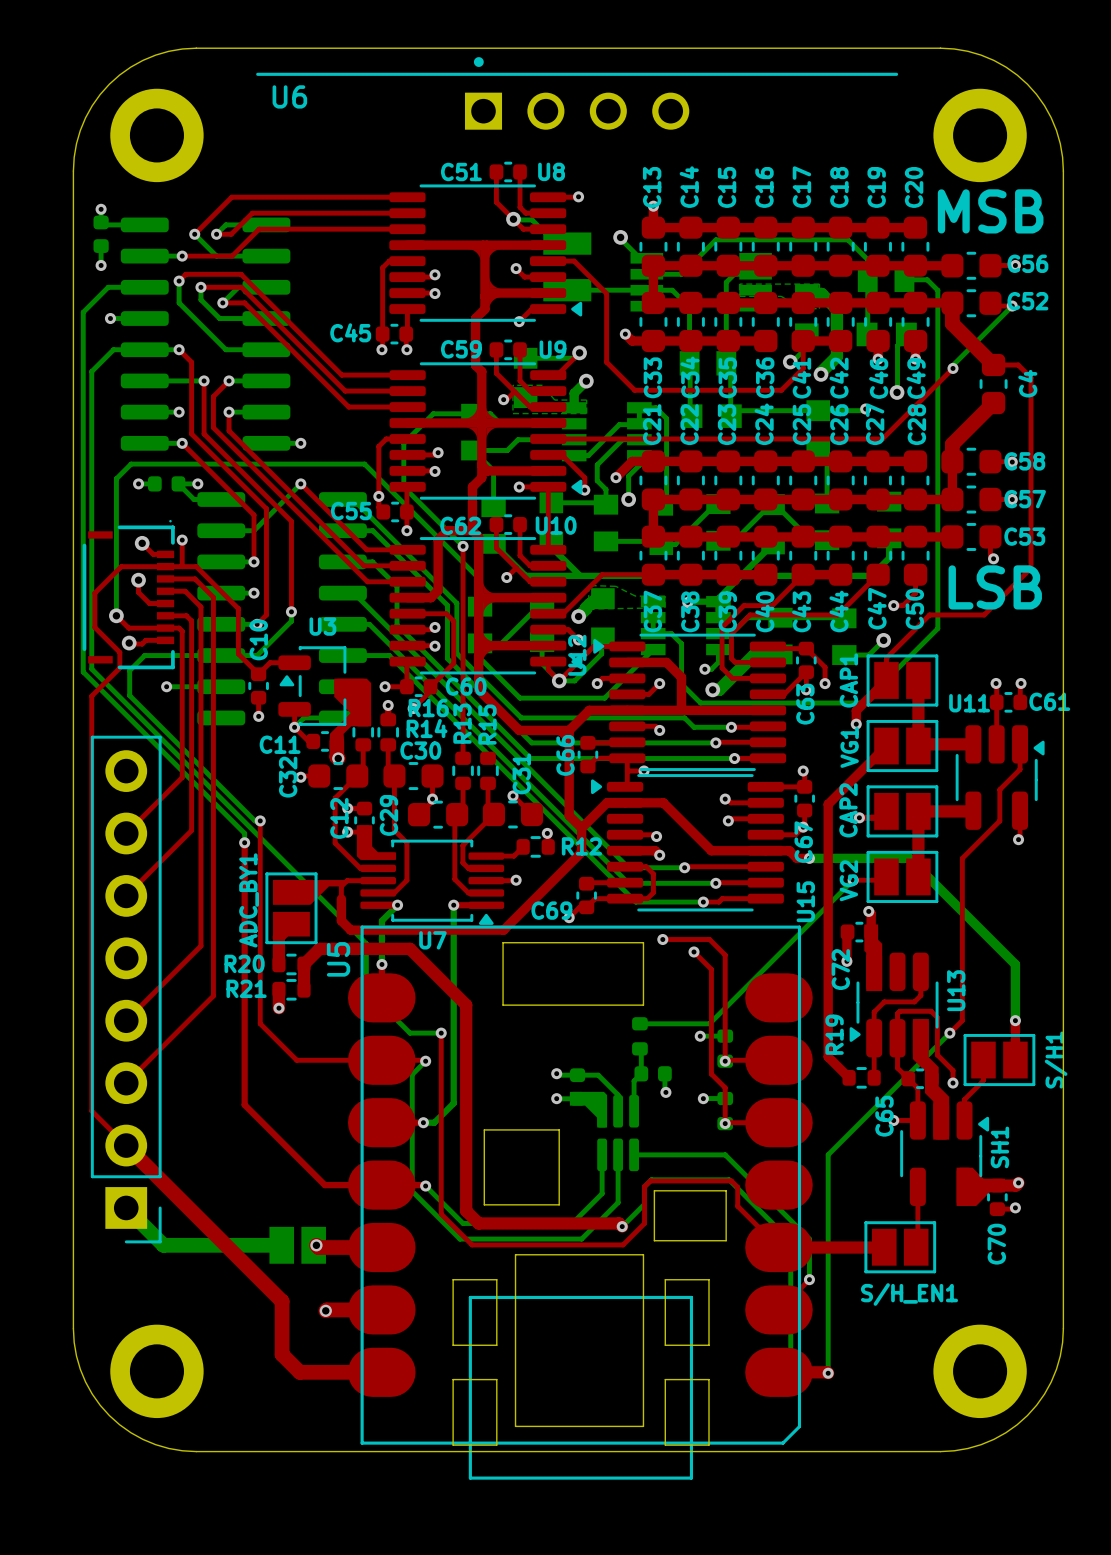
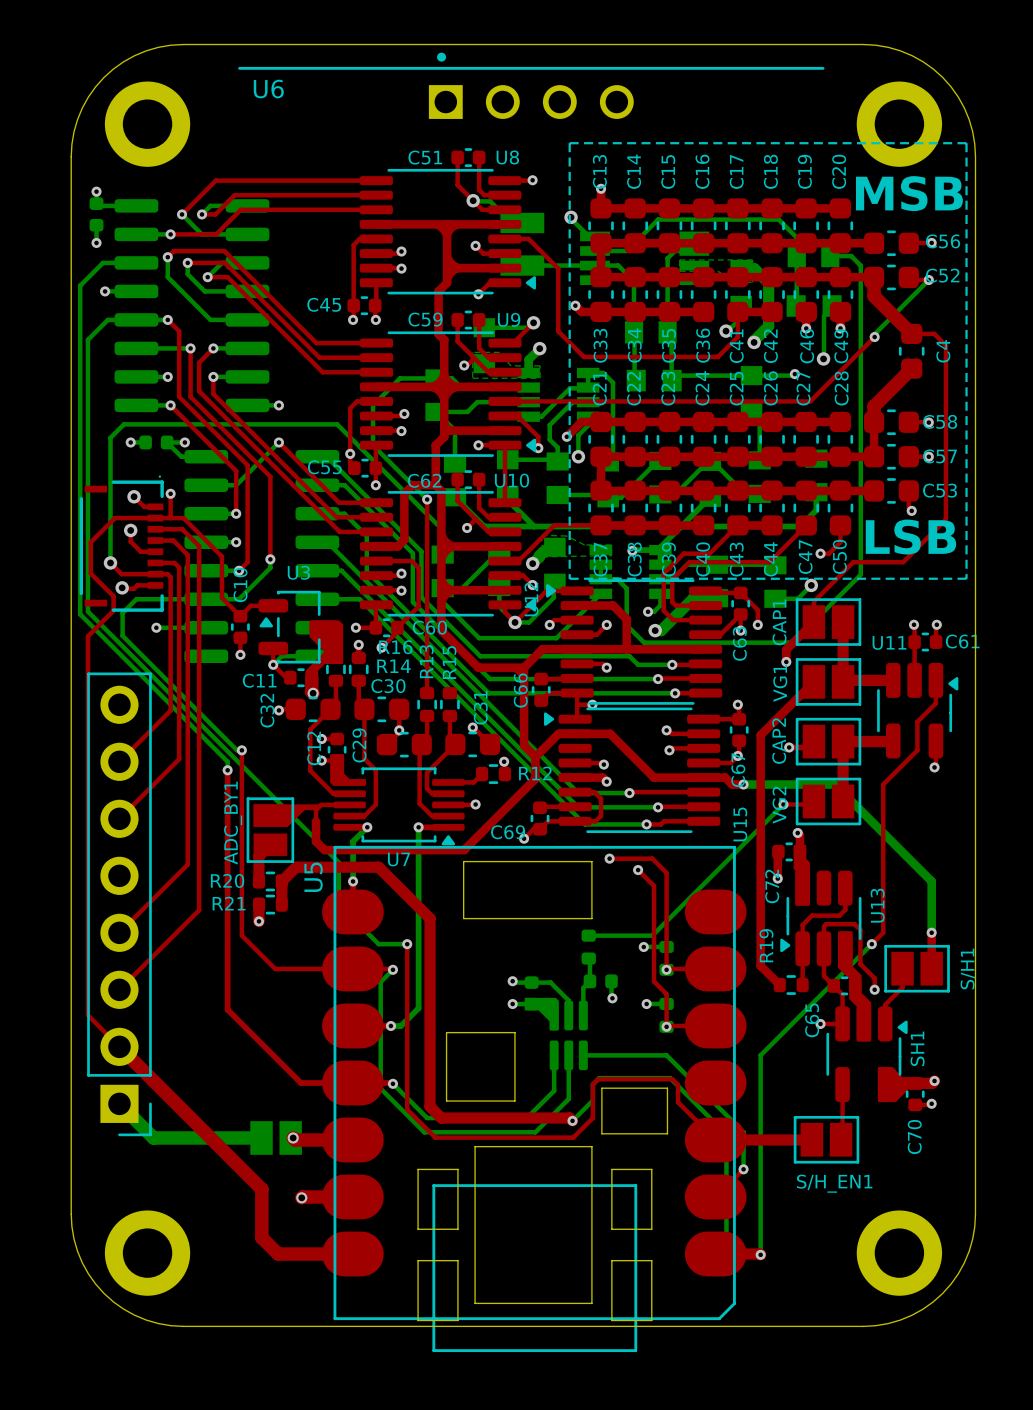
line: none -> (569, 143) (966, 143) (966, 578) (569, 578) (569, 143)

